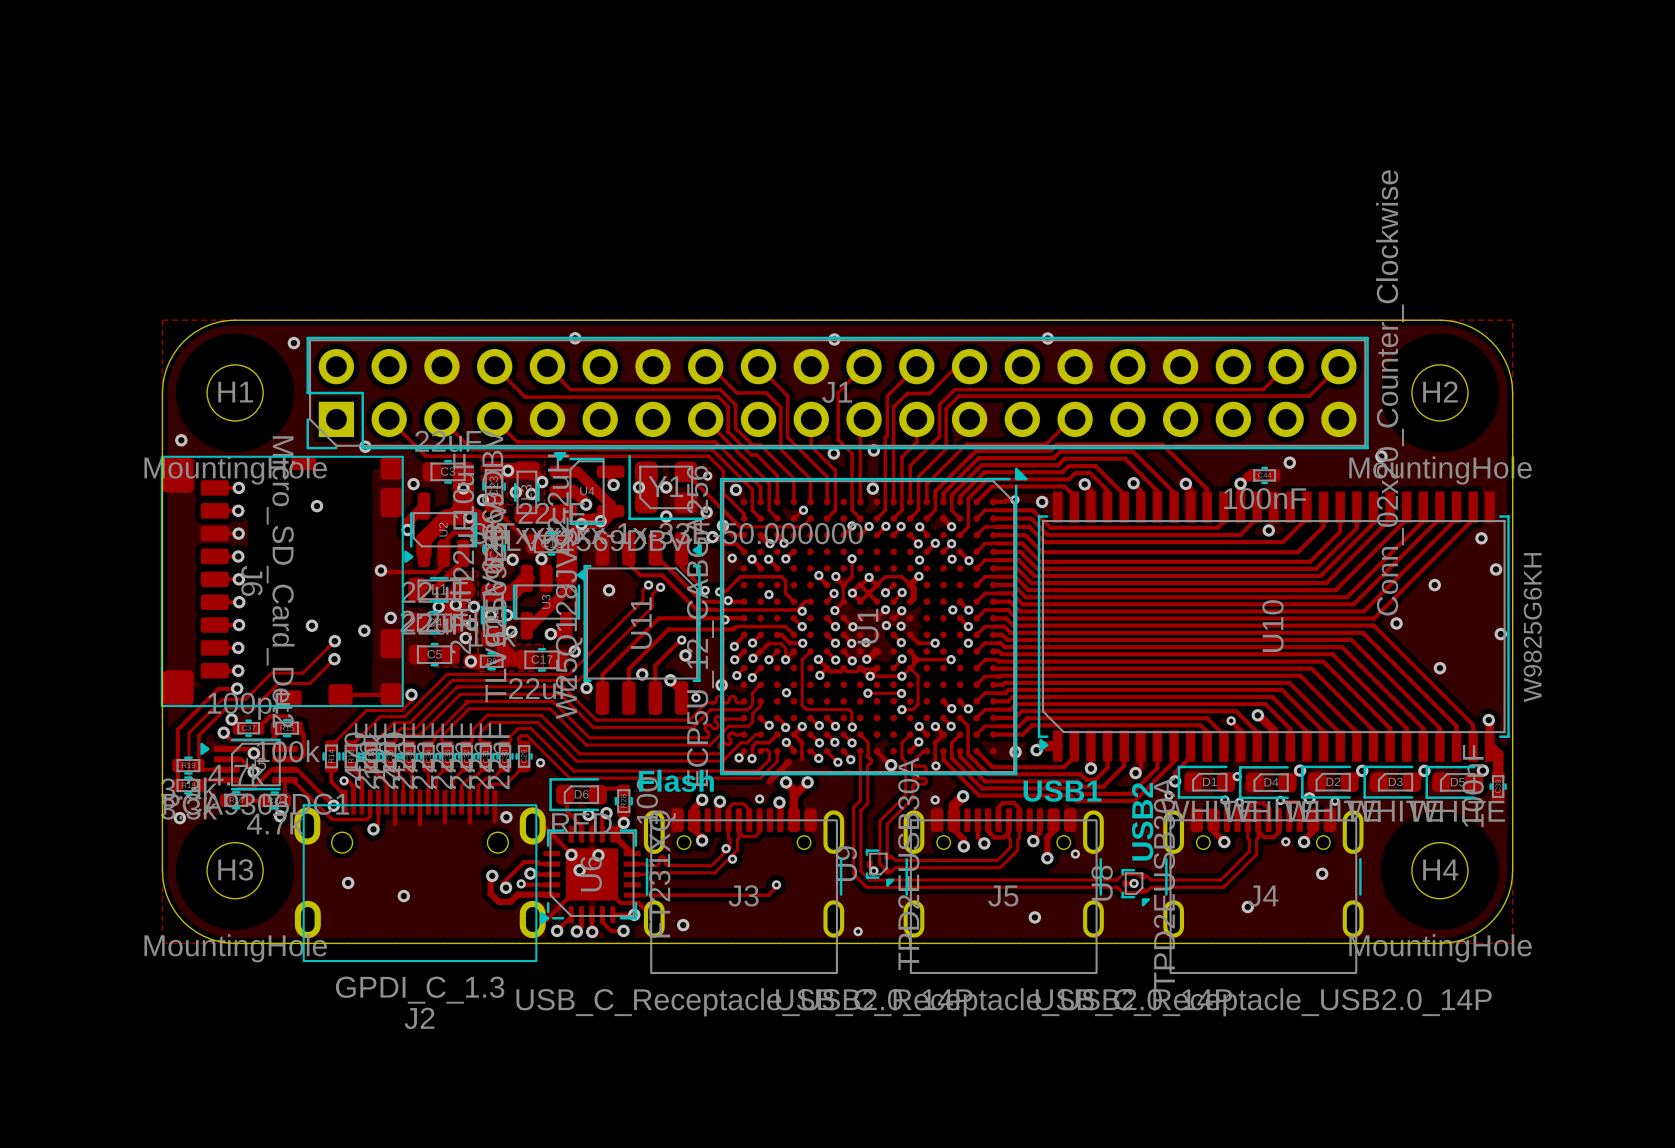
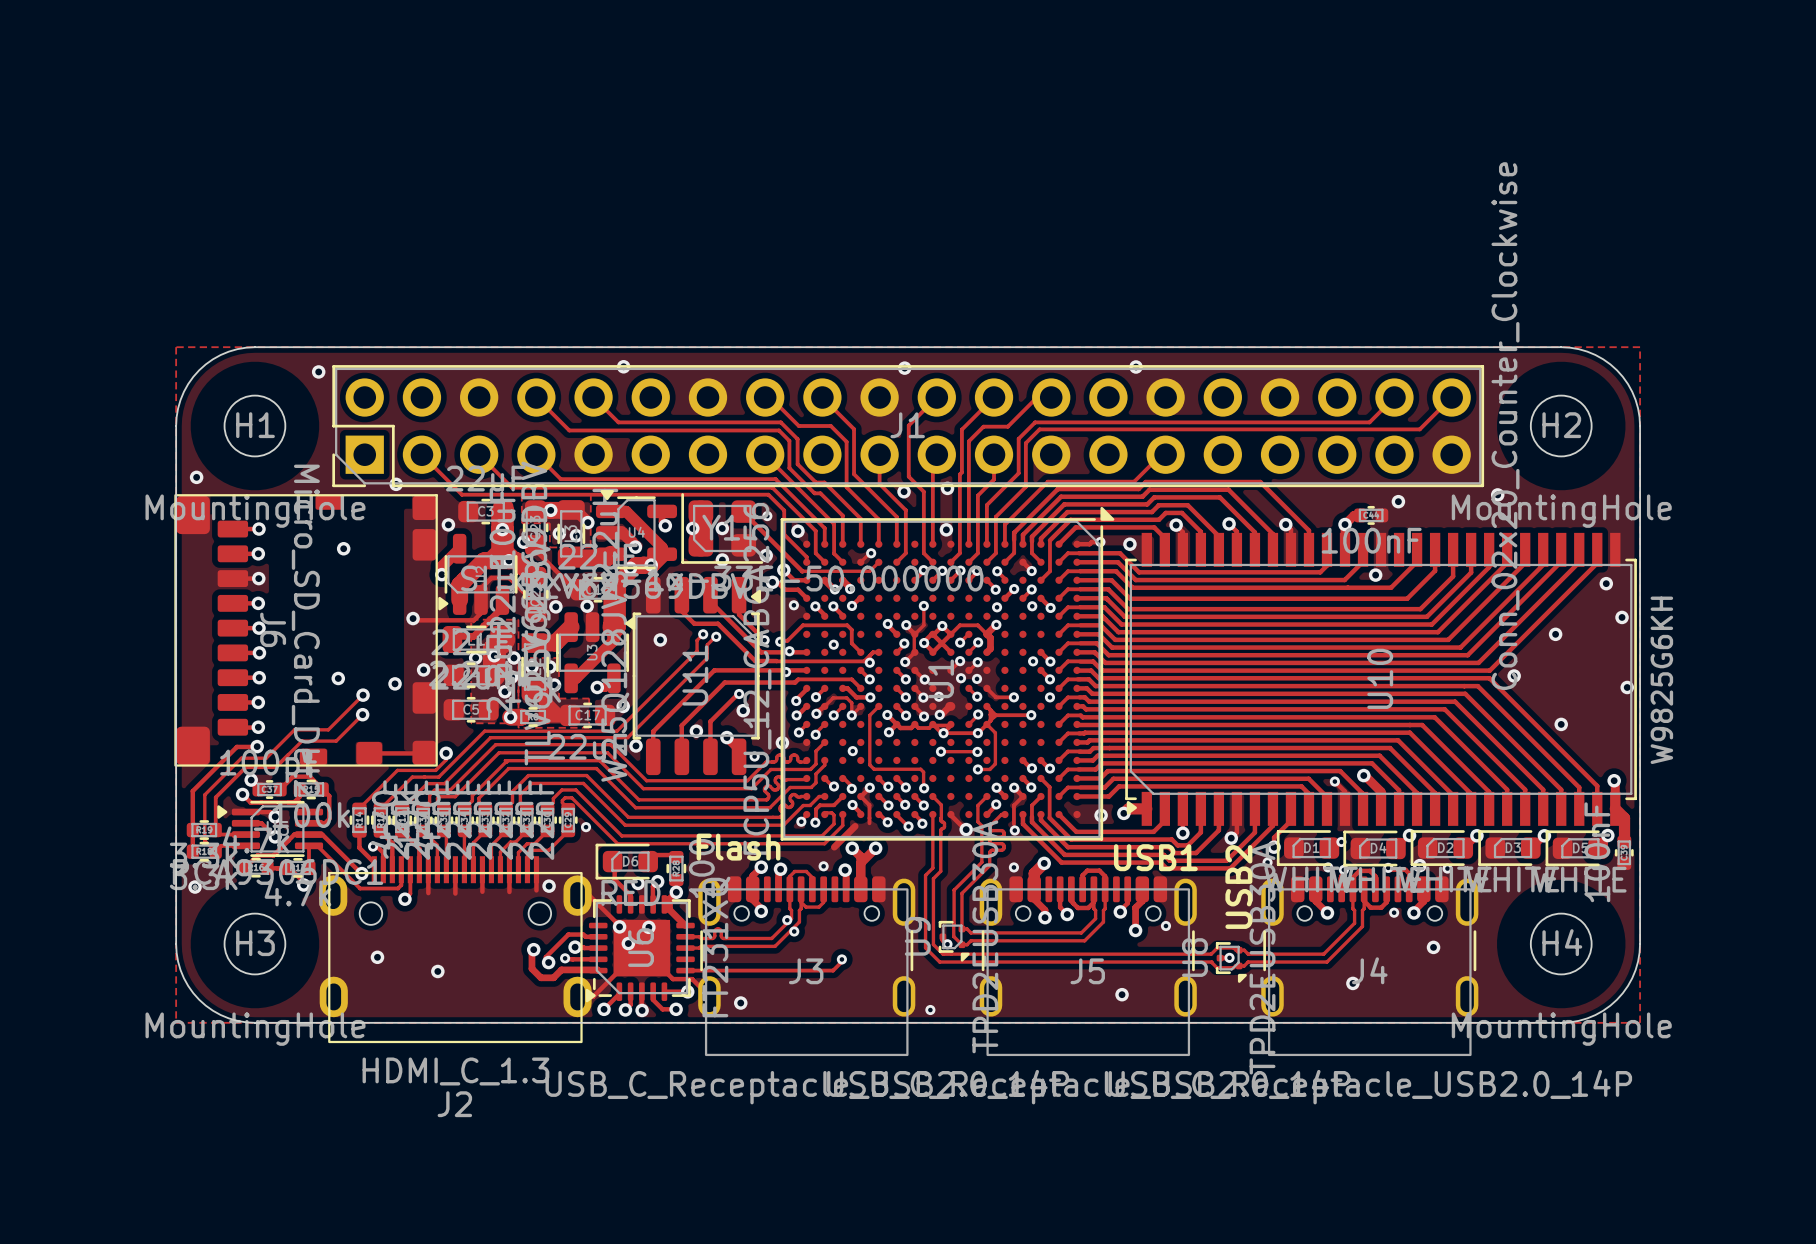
J2 value: GPDI_C_1.3 (420, 990) -> HDMI_C_1.3 (455, 1071)

